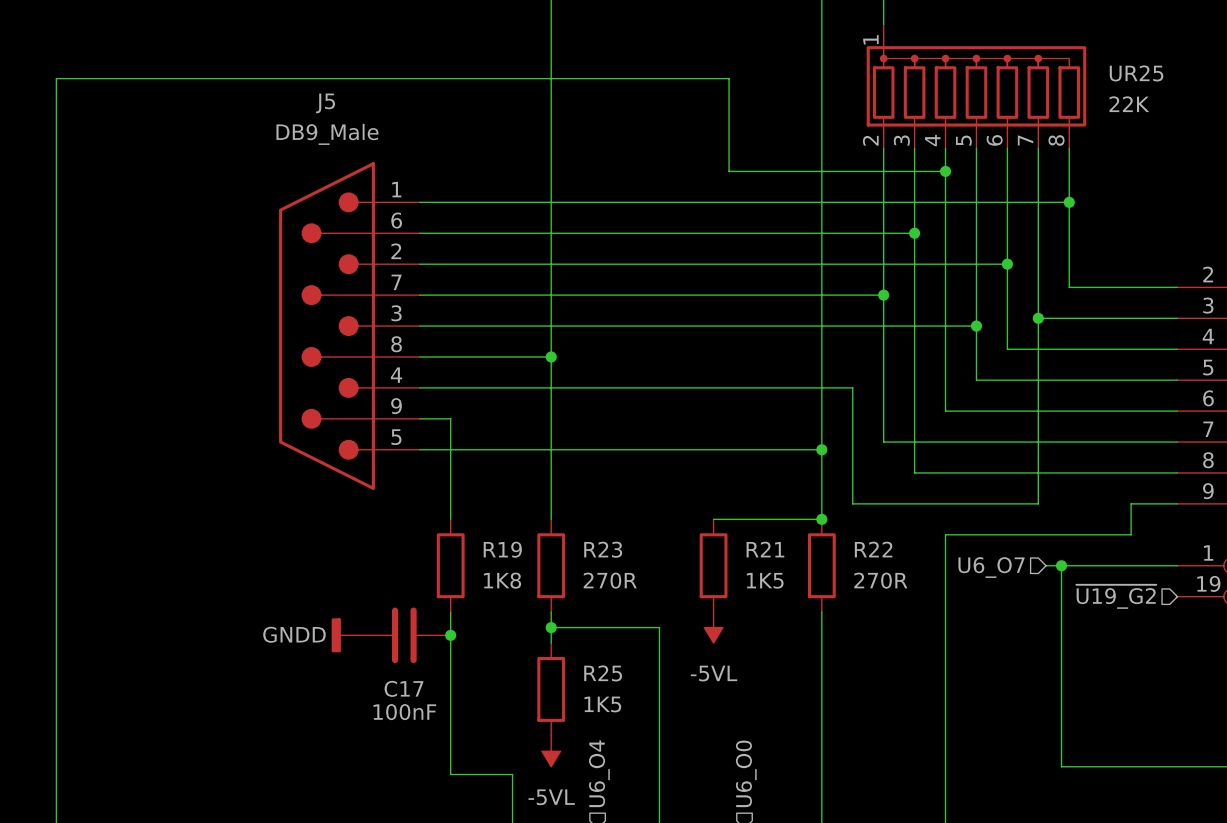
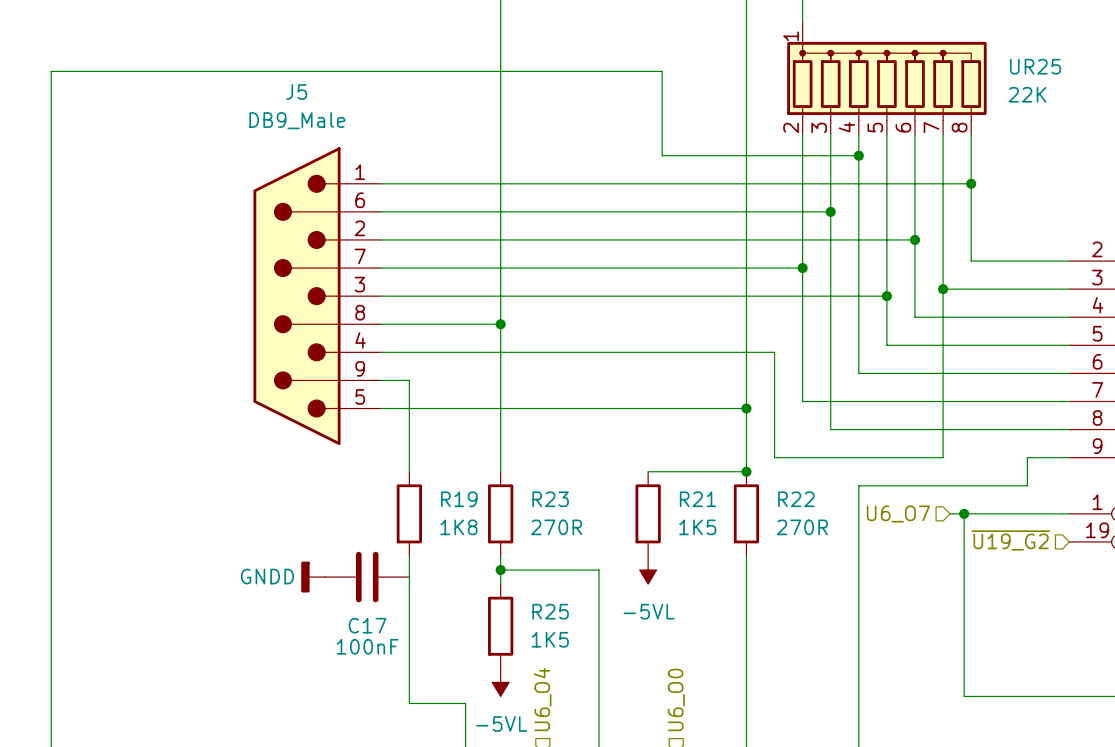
junction: (450, 635) -> none

